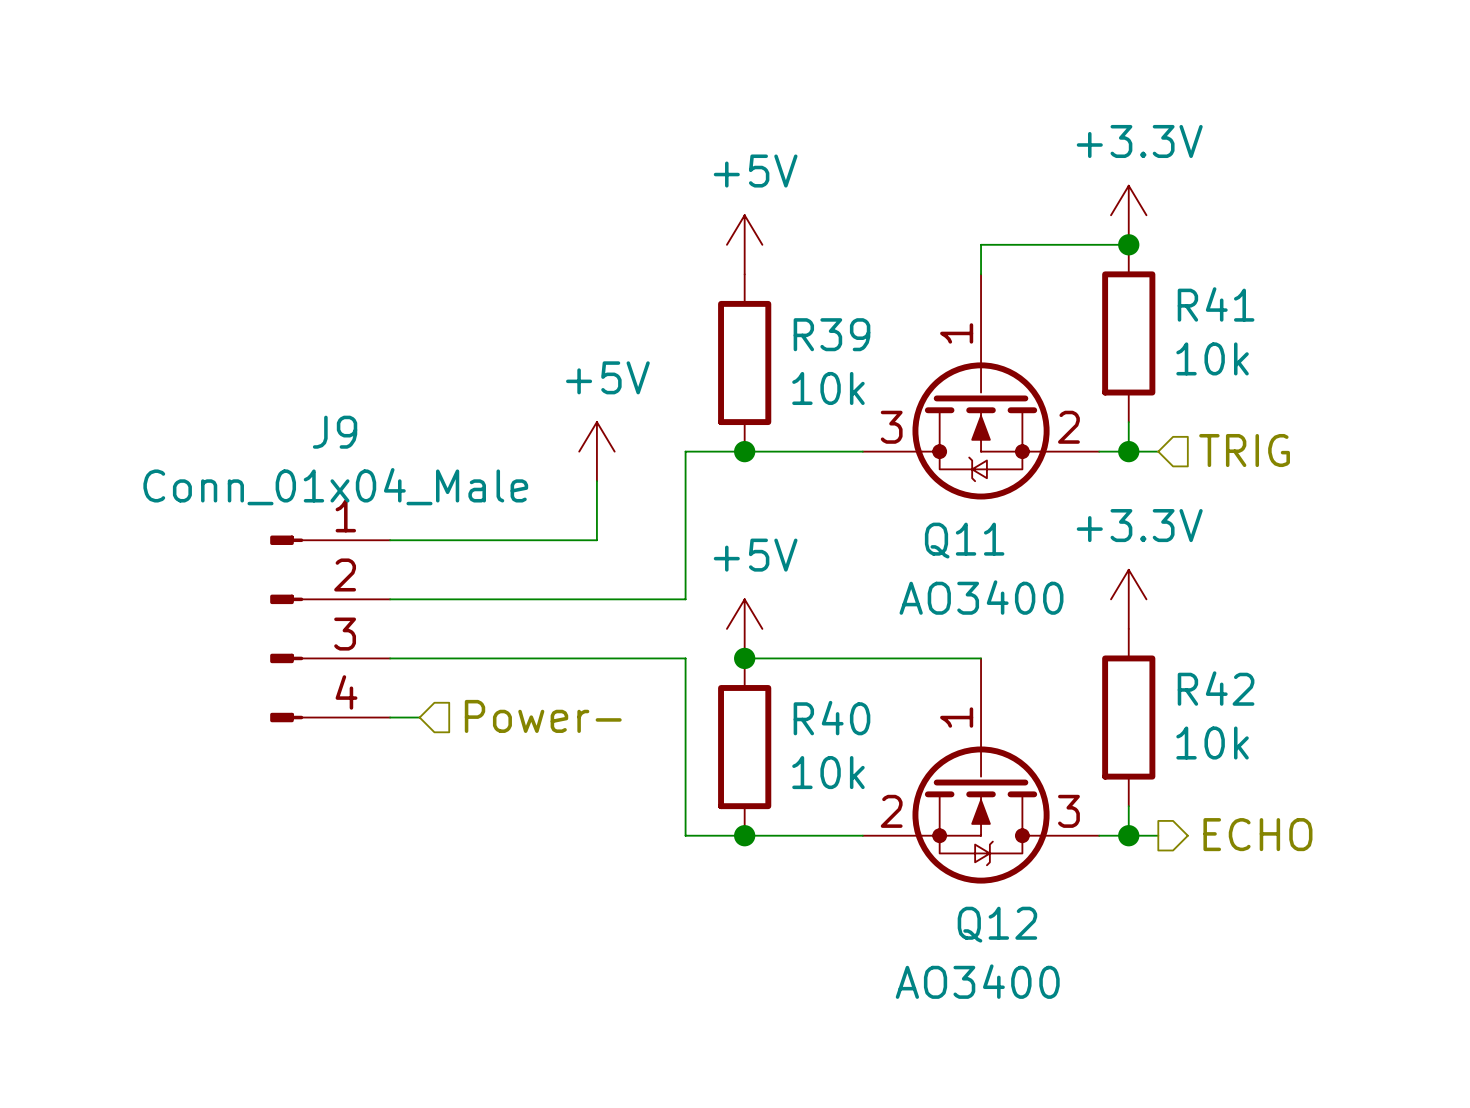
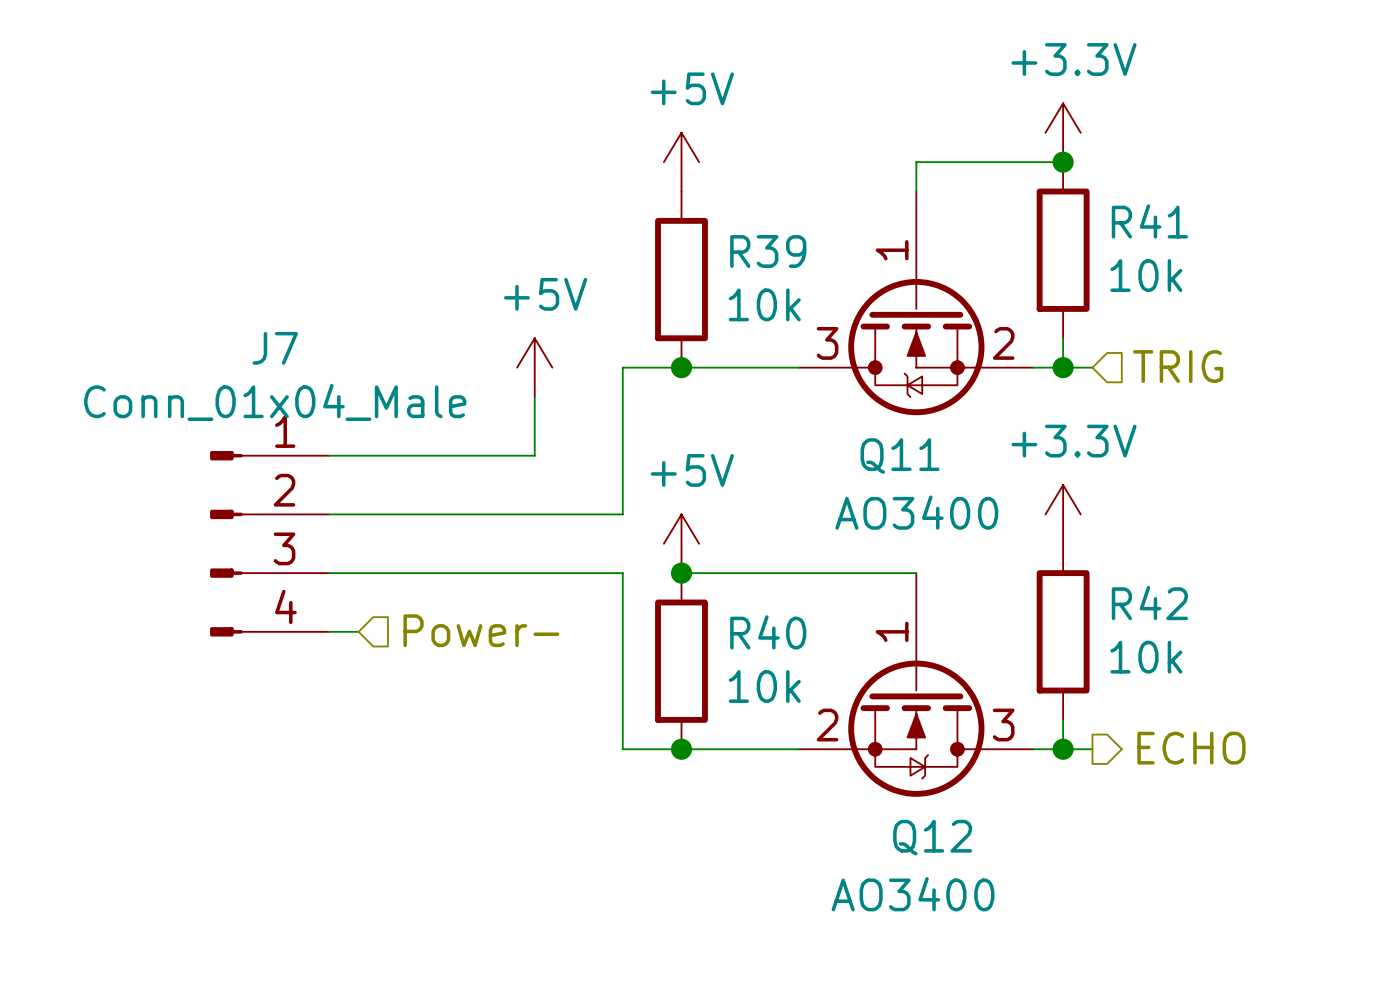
J9 name: J9 (335, 432) -> J7 (275, 348)

